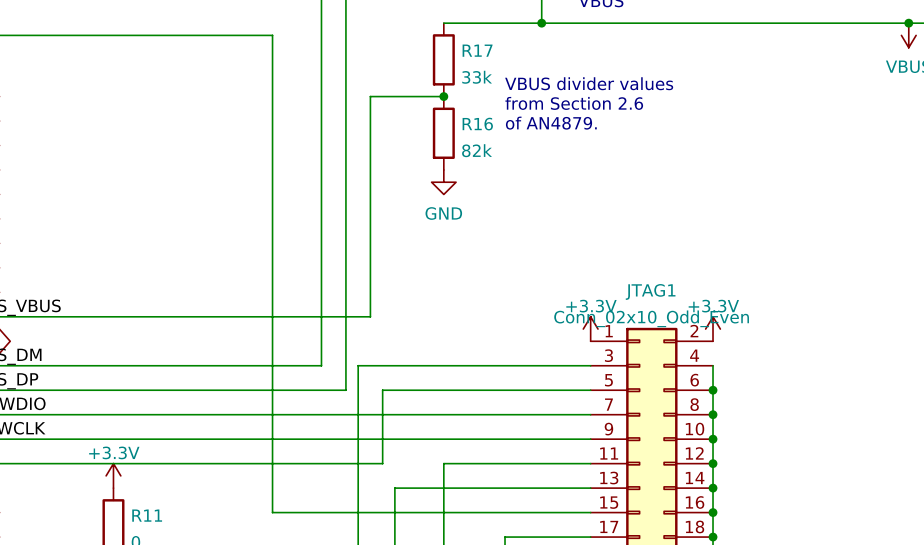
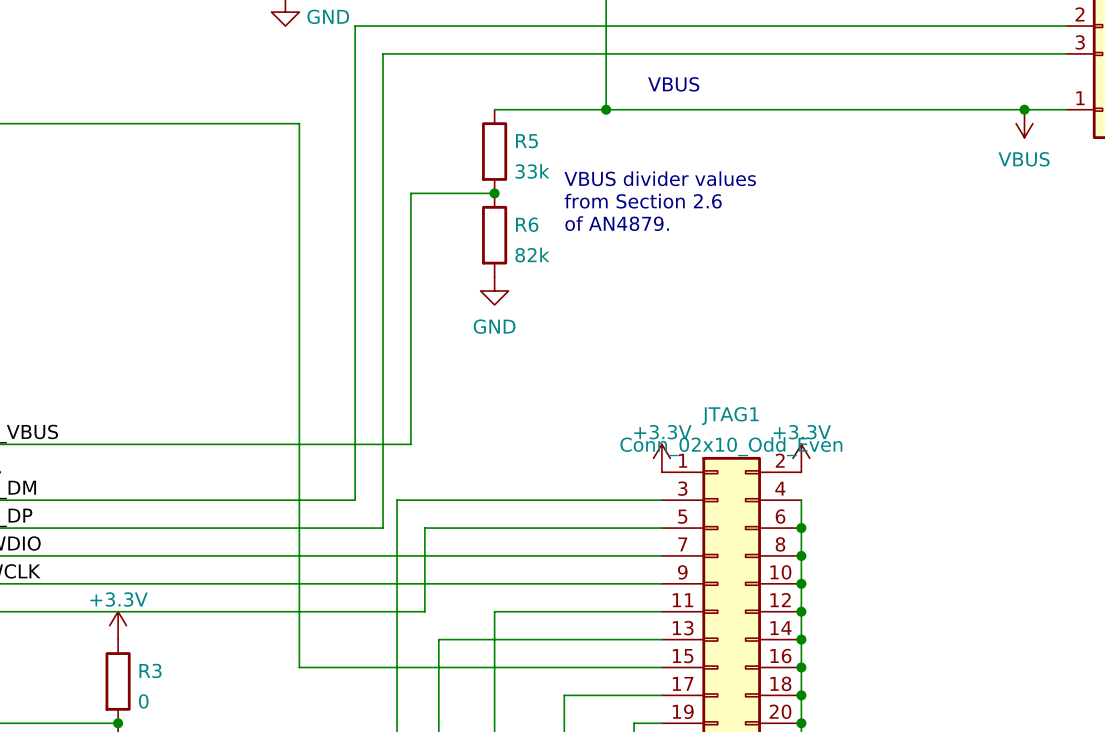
R17 name: R17 (477, 50) -> R5 (526, 141)
R16 name: R16 (477, 124) -> R6 (527, 224)
R11 name: R11 (147, 515) -> R3 (150, 670)

